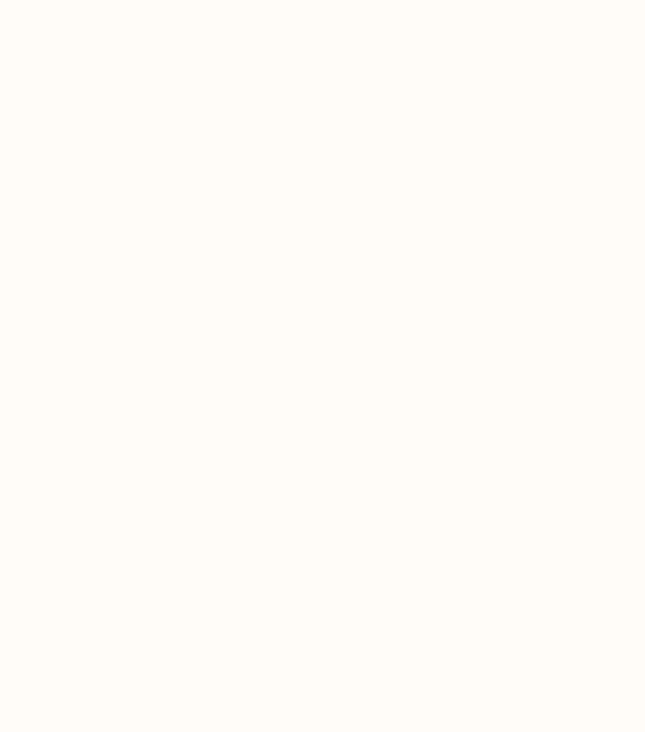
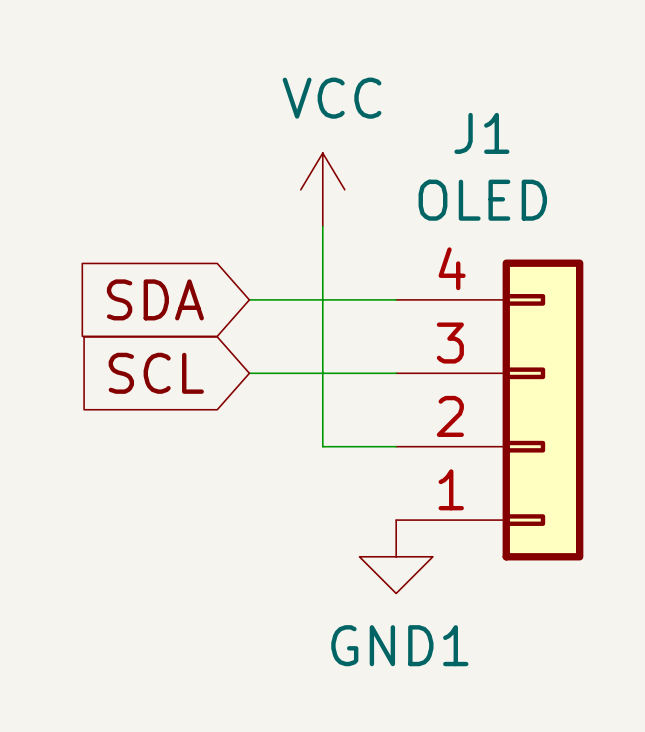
power symbol: none -> VCC (322, 189)
wire: none -> (322, 226) (322, 446) (396, 446)
global label: none -> SDA (155, 299)
wire: none -> (249, 299) (396, 299)
global label: none -> SCL (156, 373)
wire: none -> (249, 373) (396, 373)
J1: none -> OLED (489, 409)
power symbol: none -> GND1 (396, 556)

